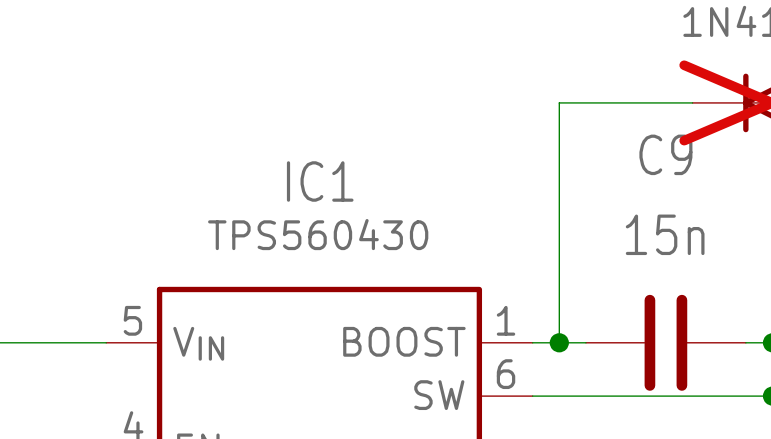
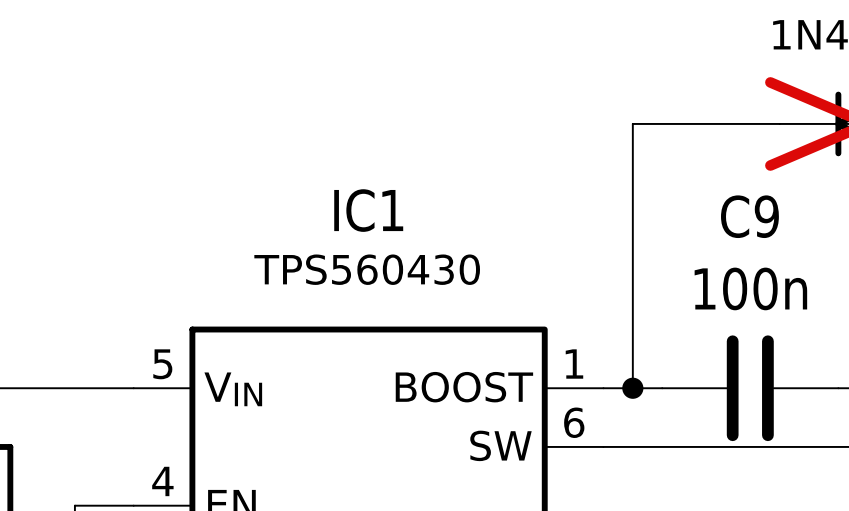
C9 name position: C9 (665, 154) -> C9 (749, 216)
C9 value: 15n (665, 234) -> 100n (750, 288)

